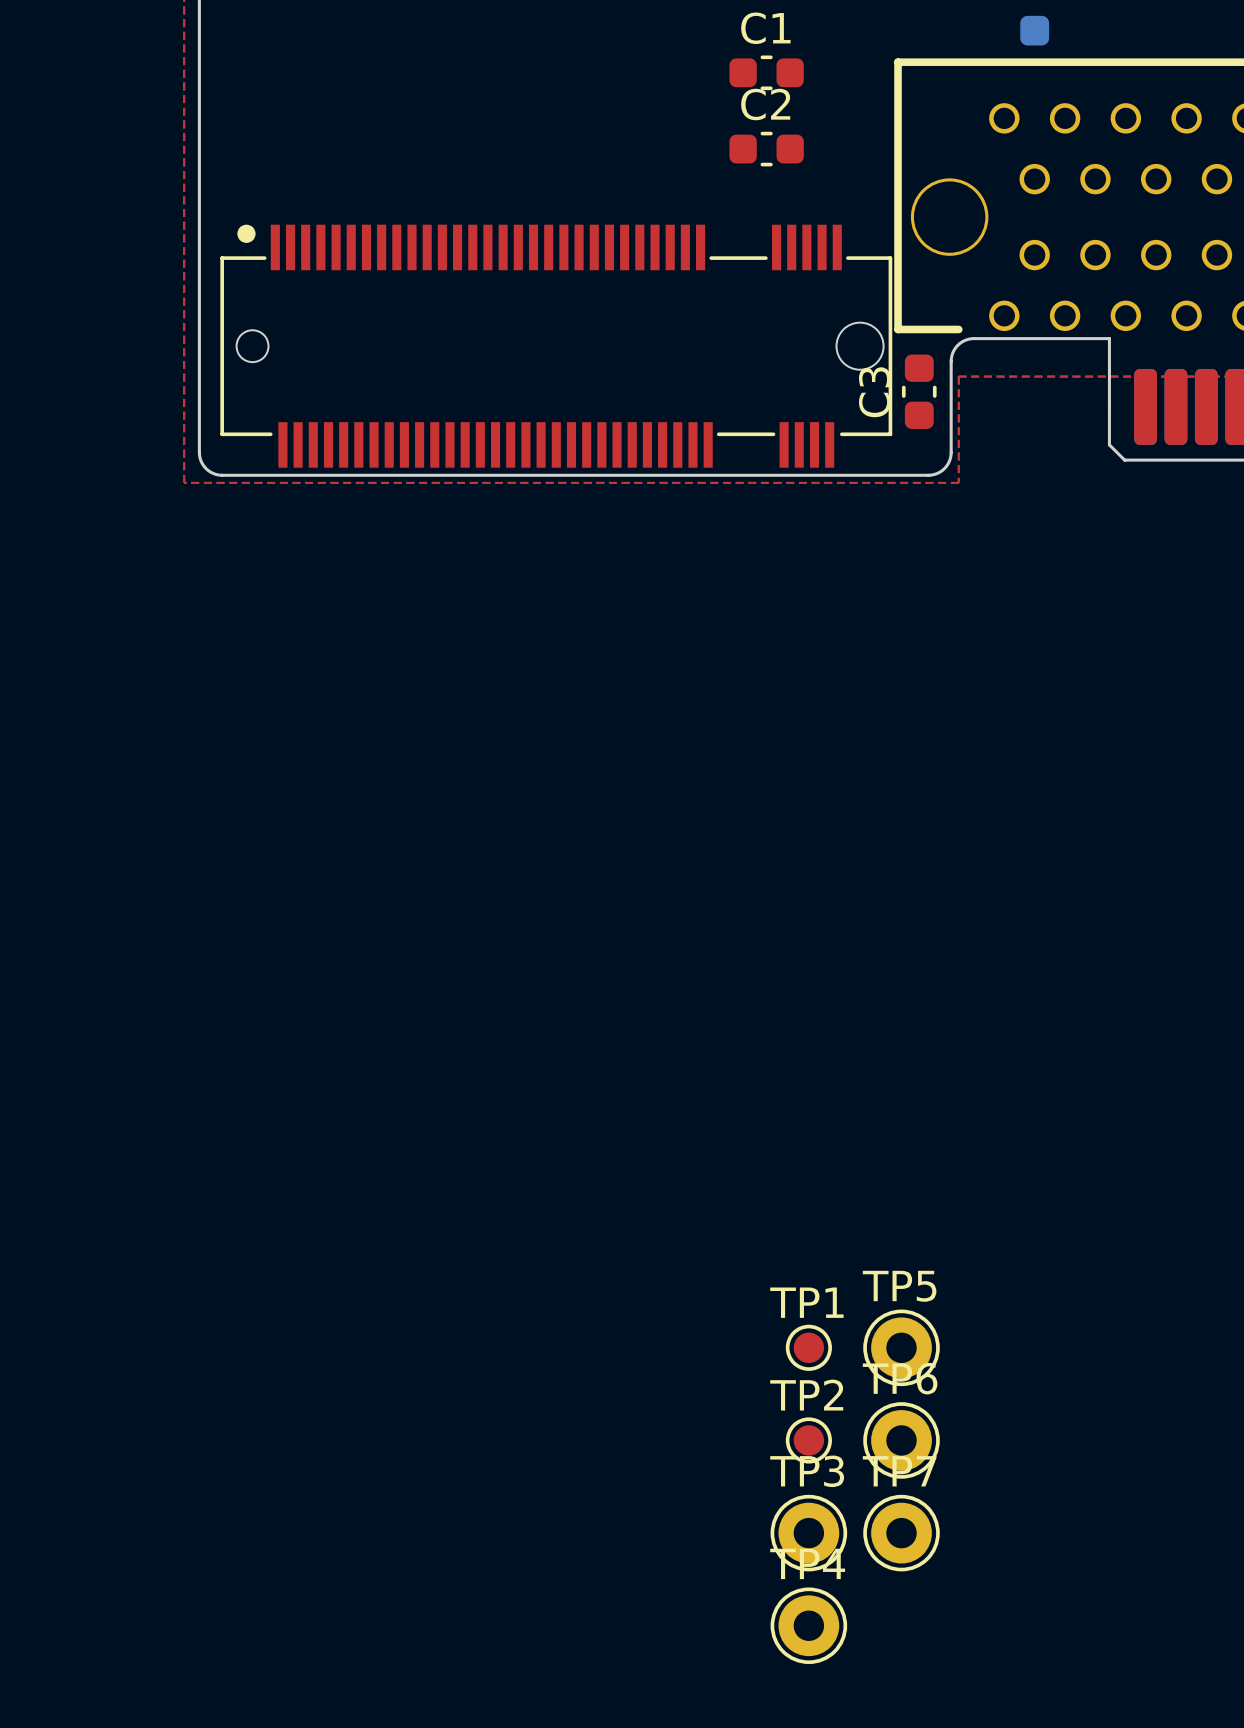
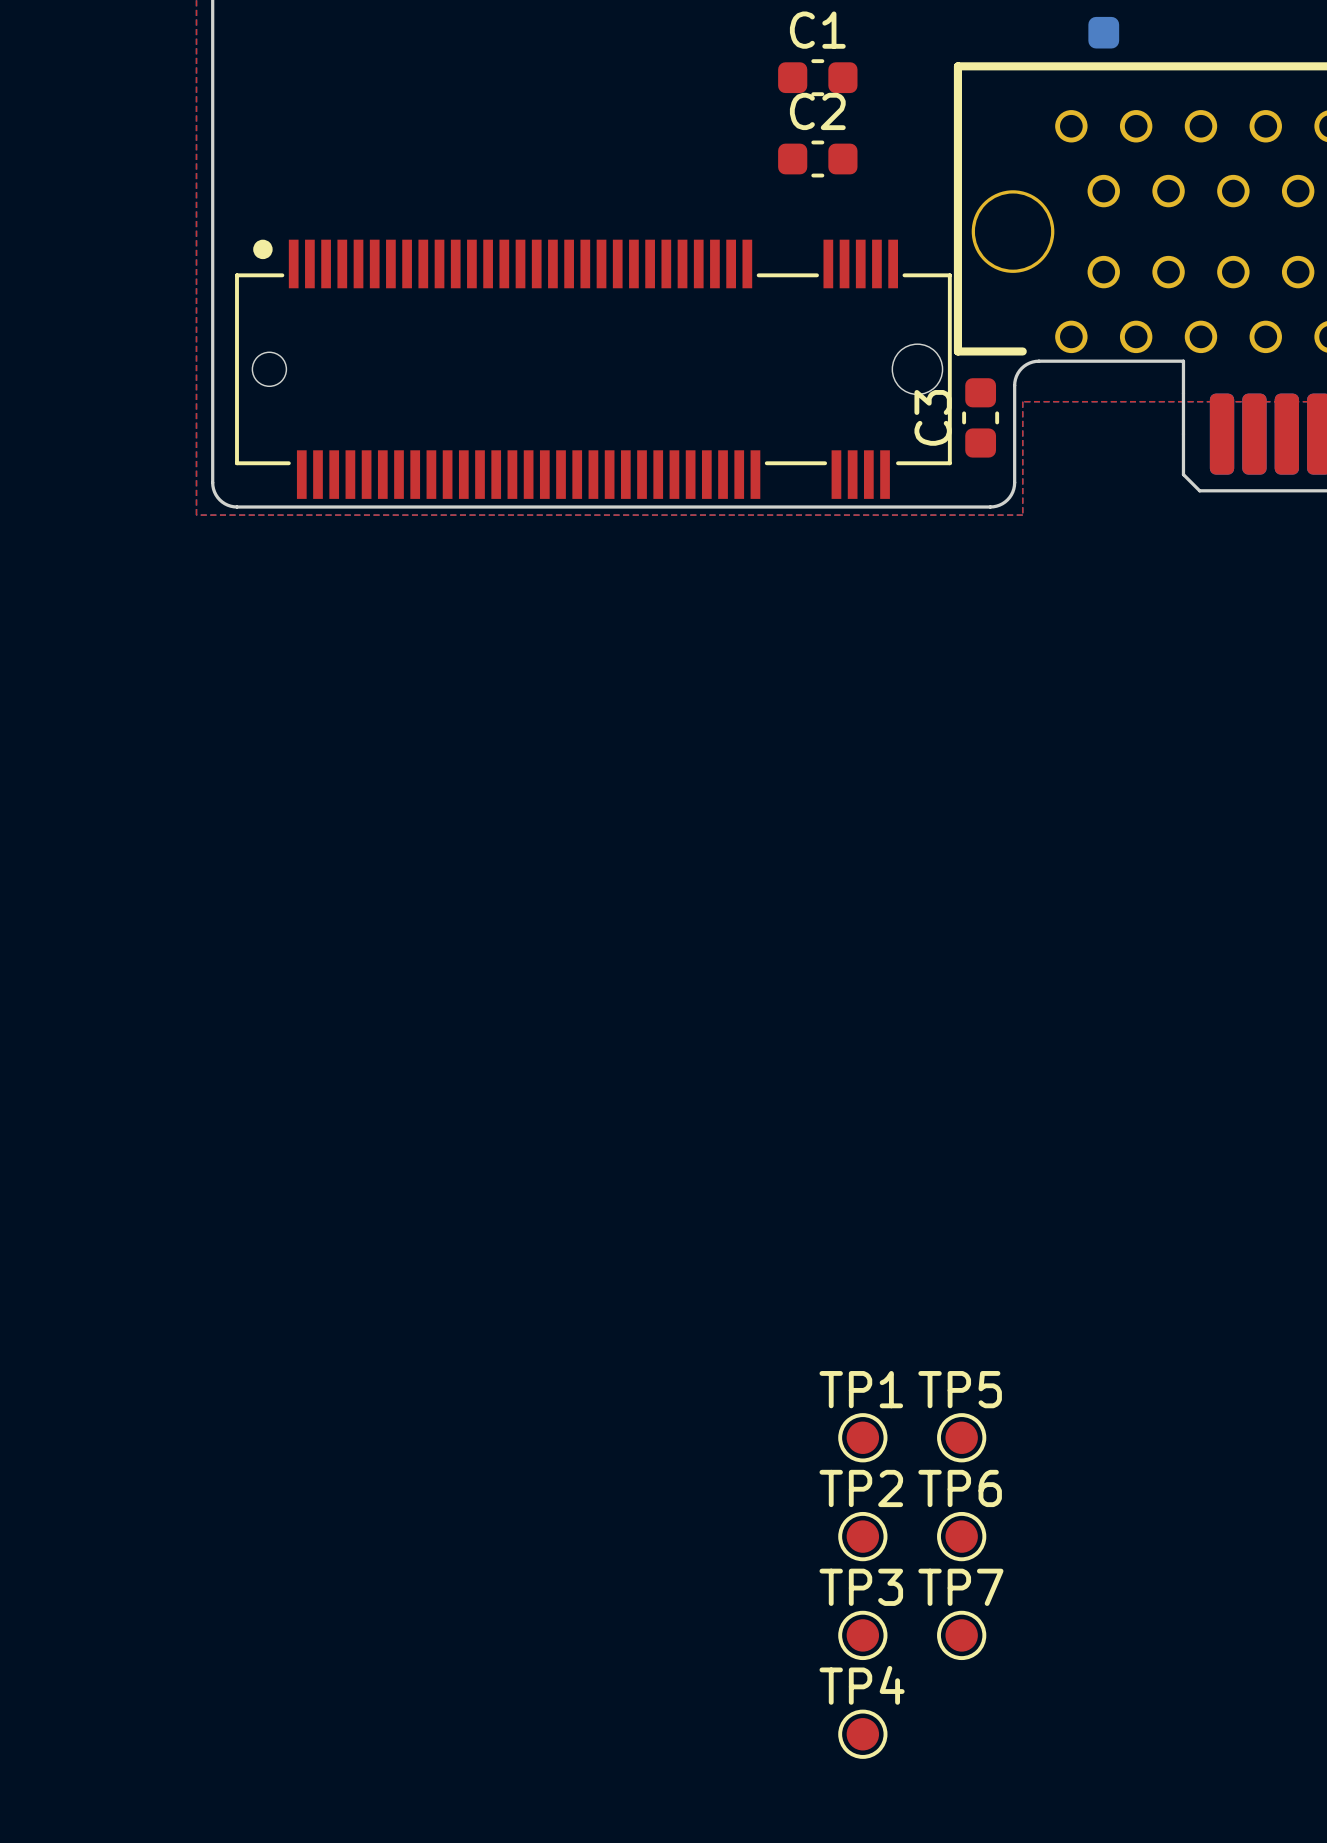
TP5 footprint: [863, 1309, 940, 1387] -> [937, 1413, 987, 1463]
TP6 footprint: [863, 1402, 940, 1479] -> [937, 1511, 987, 1562]
TP3 footprint: [770, 1494, 848, 1572] -> [838, 1610, 888, 1661]
TP7 footprint: [863, 1494, 940, 1572] -> [937, 1610, 987, 1661]
TP4 footprint: [770, 1587, 848, 1665] -> [838, 1709, 888, 1759]

